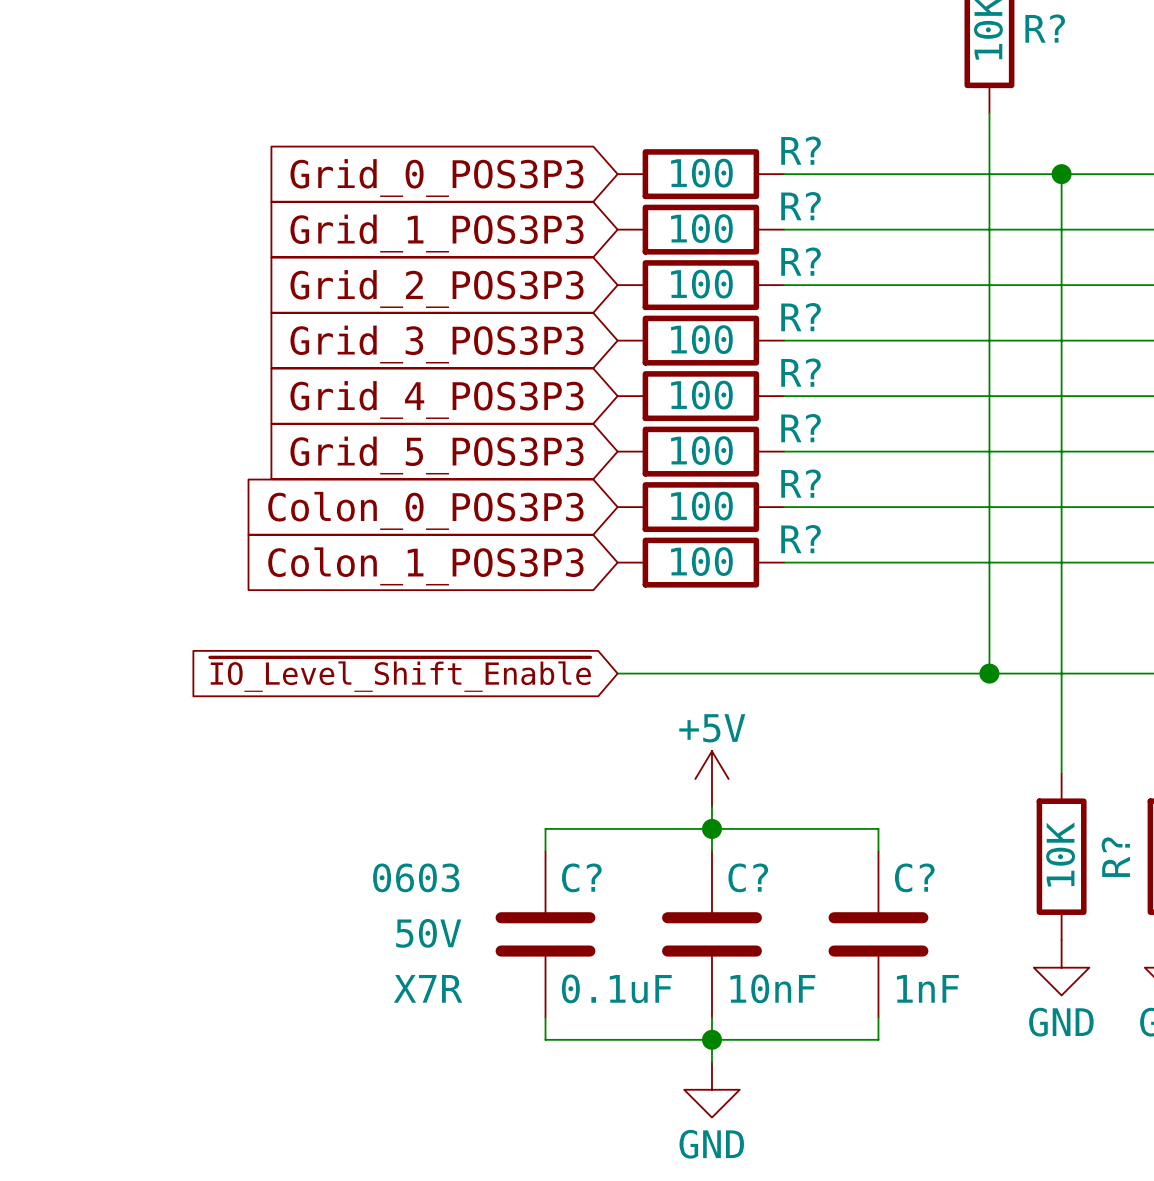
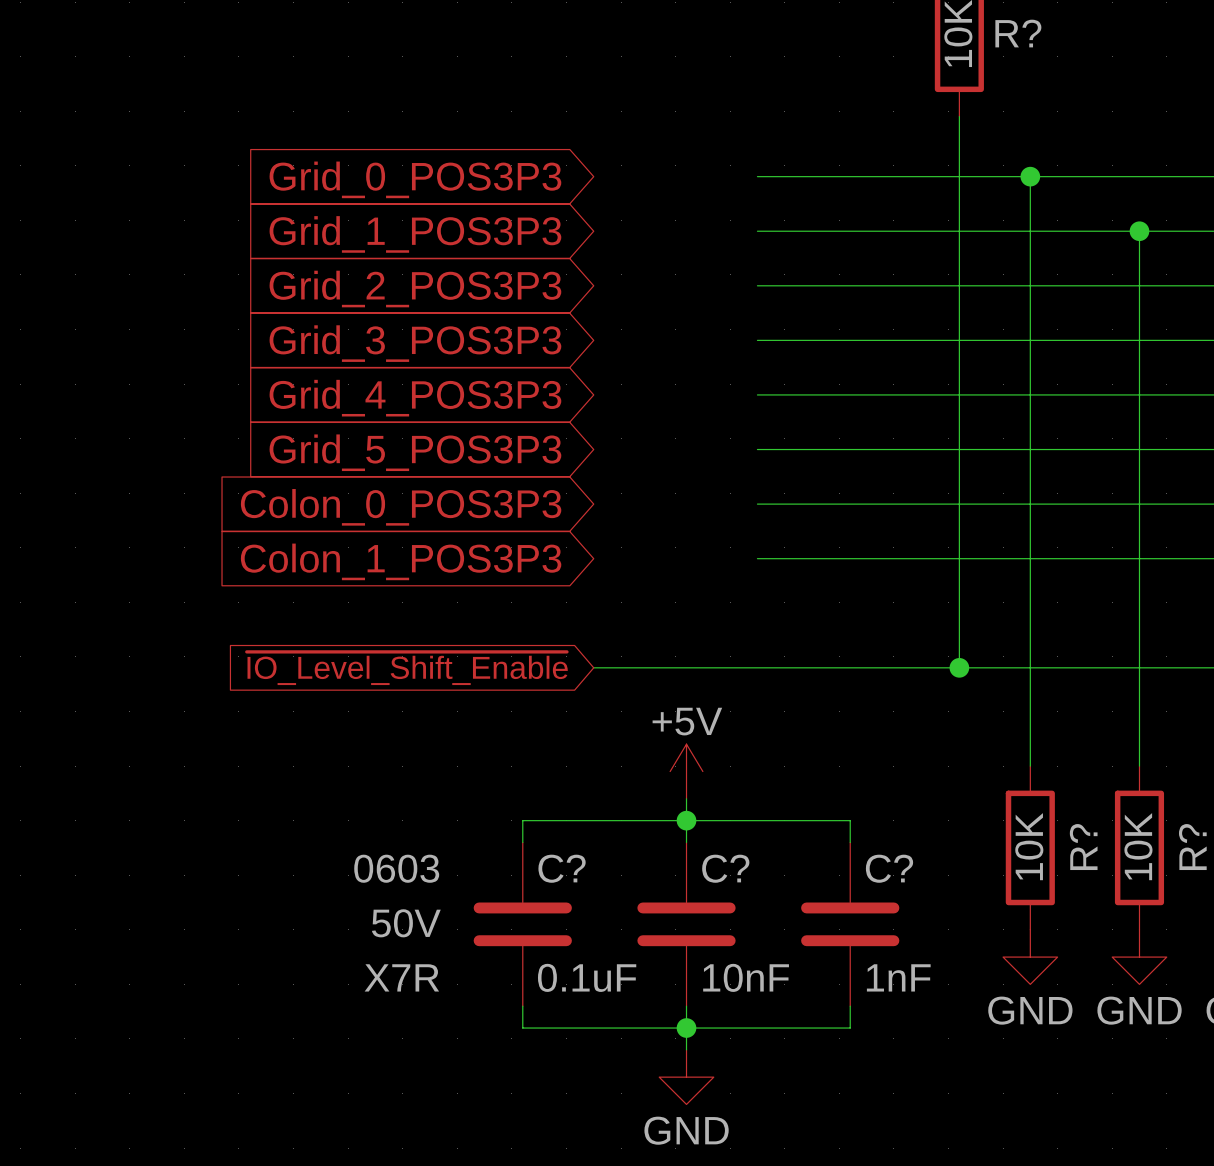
R?: 100 (700, 174) -> none
R?: 100 (700, 229) -> none
R?: 100 (700, 285) -> none
R?: 100 (700, 340) -> none
R?: 100 (700, 396) -> none
R?: 100 (700, 451) -> none
R?: 100 (700, 507) -> none
R?: 100 (700, 562) -> none

